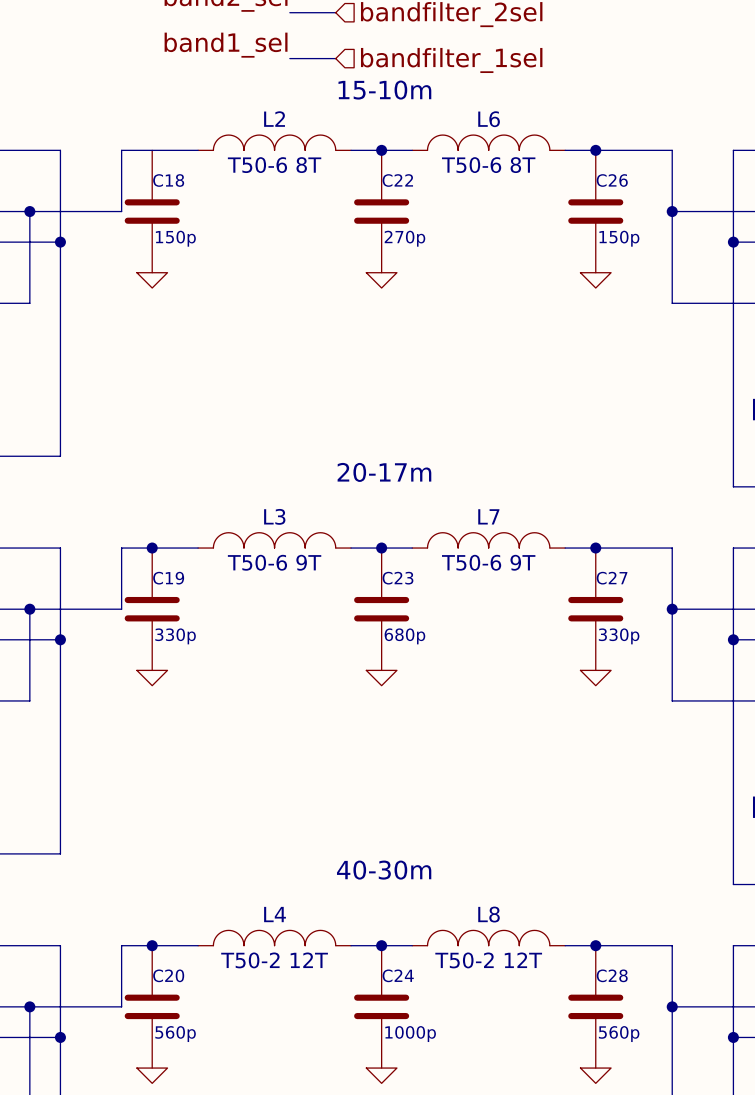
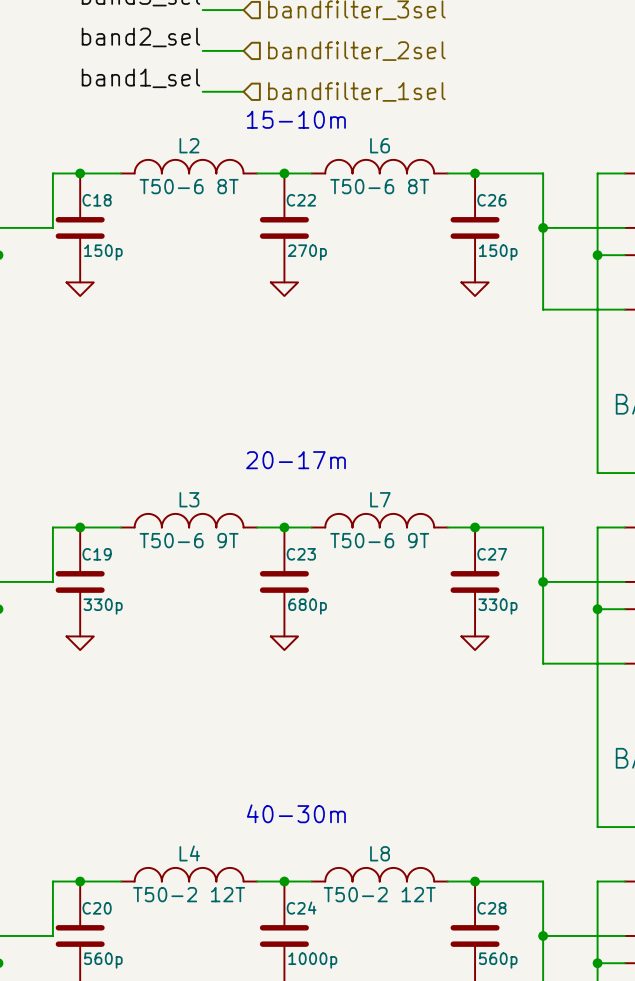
junction: none -> (80, 173)

